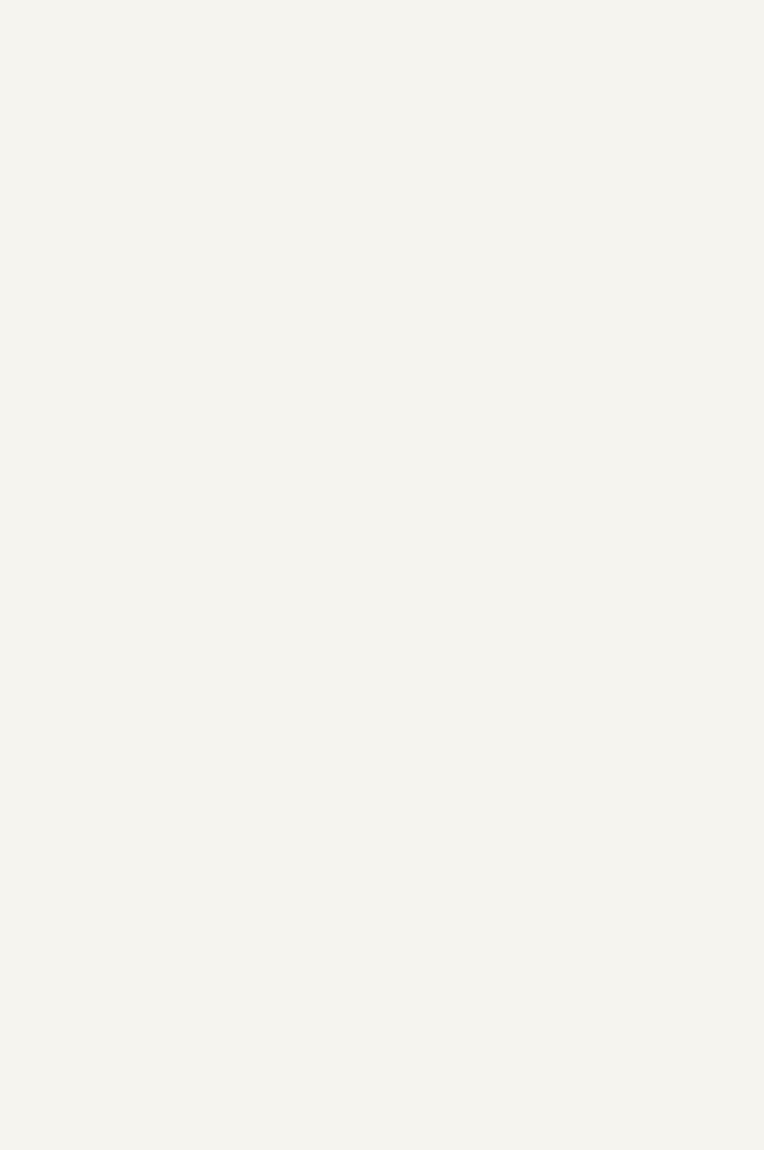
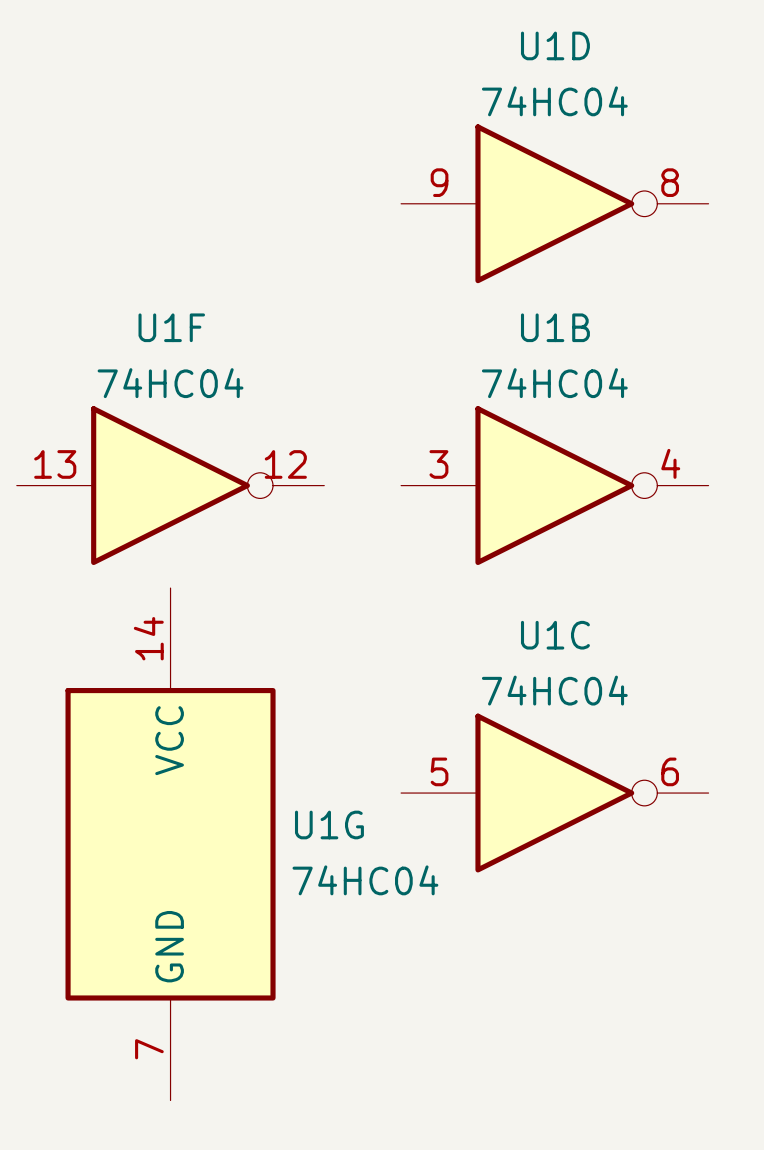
U1D: none -> 74HC04 (554, 203)
U1F: none -> 74HC04 (170, 485)
U1B: none -> 74HC04 (554, 485)
U1C: none -> 74HC04 (554, 793)
U1G: none -> 74HC04 (170, 844)

